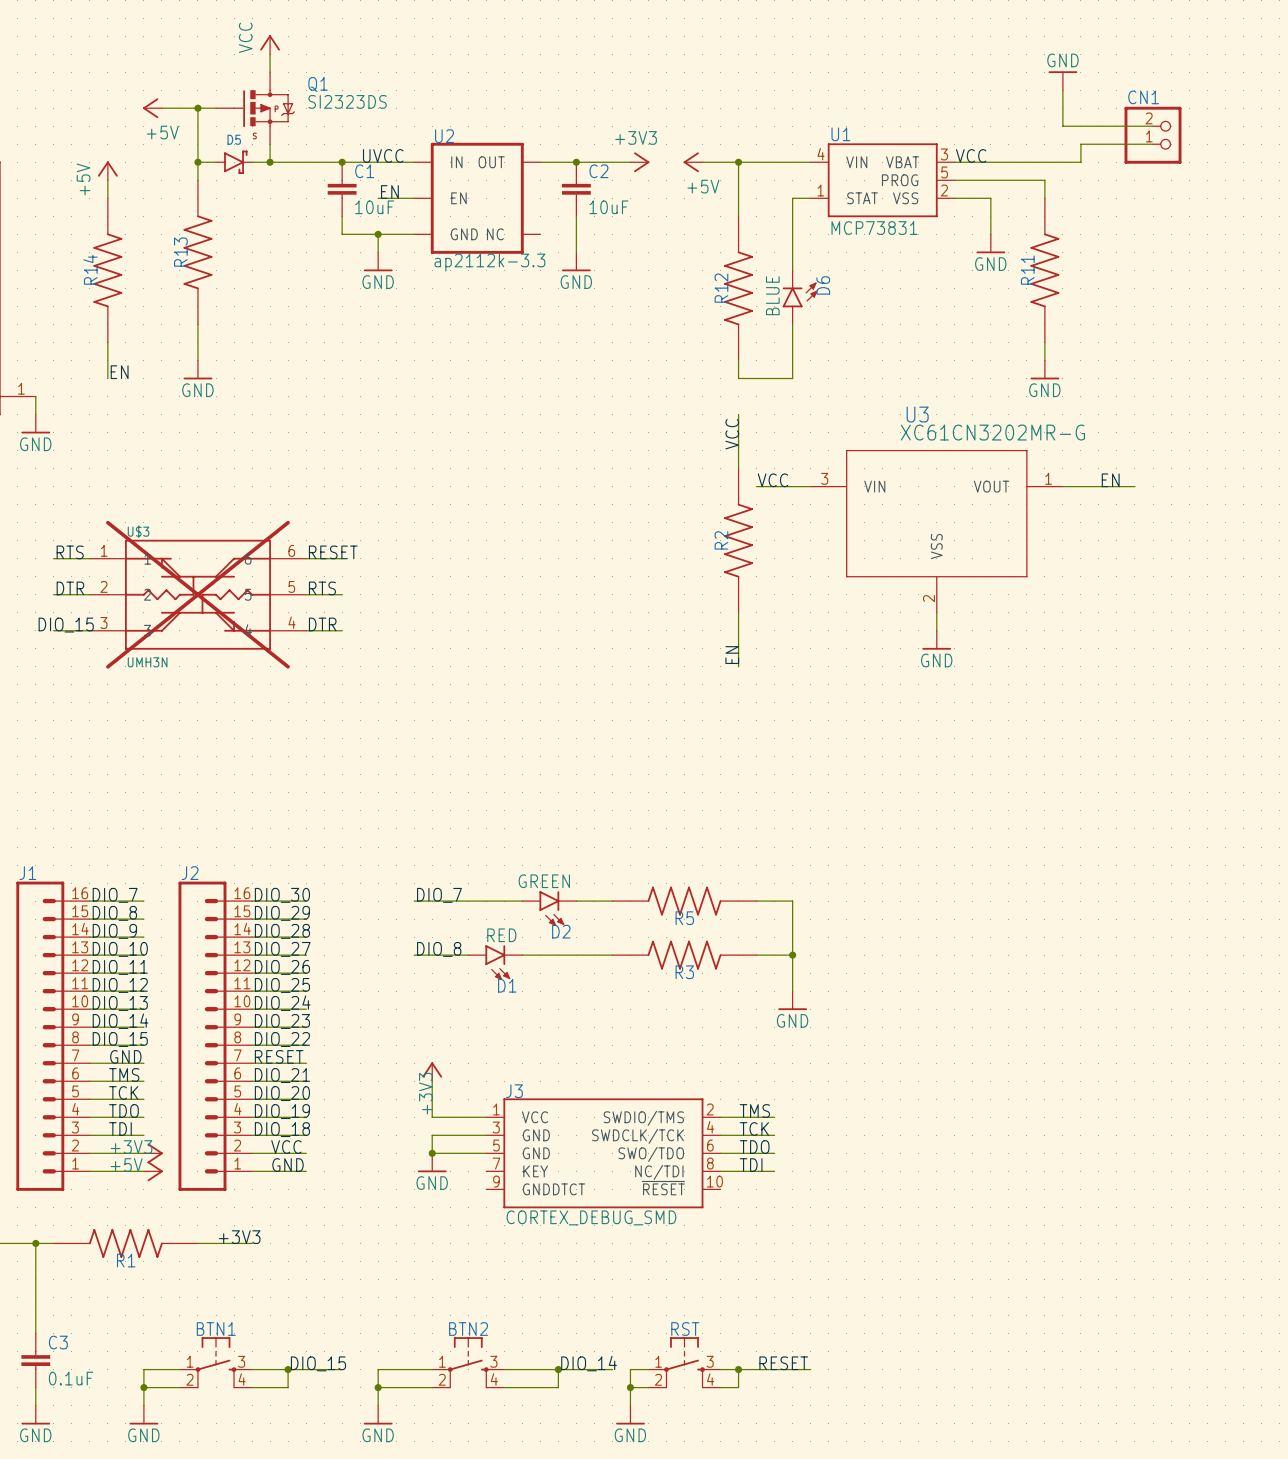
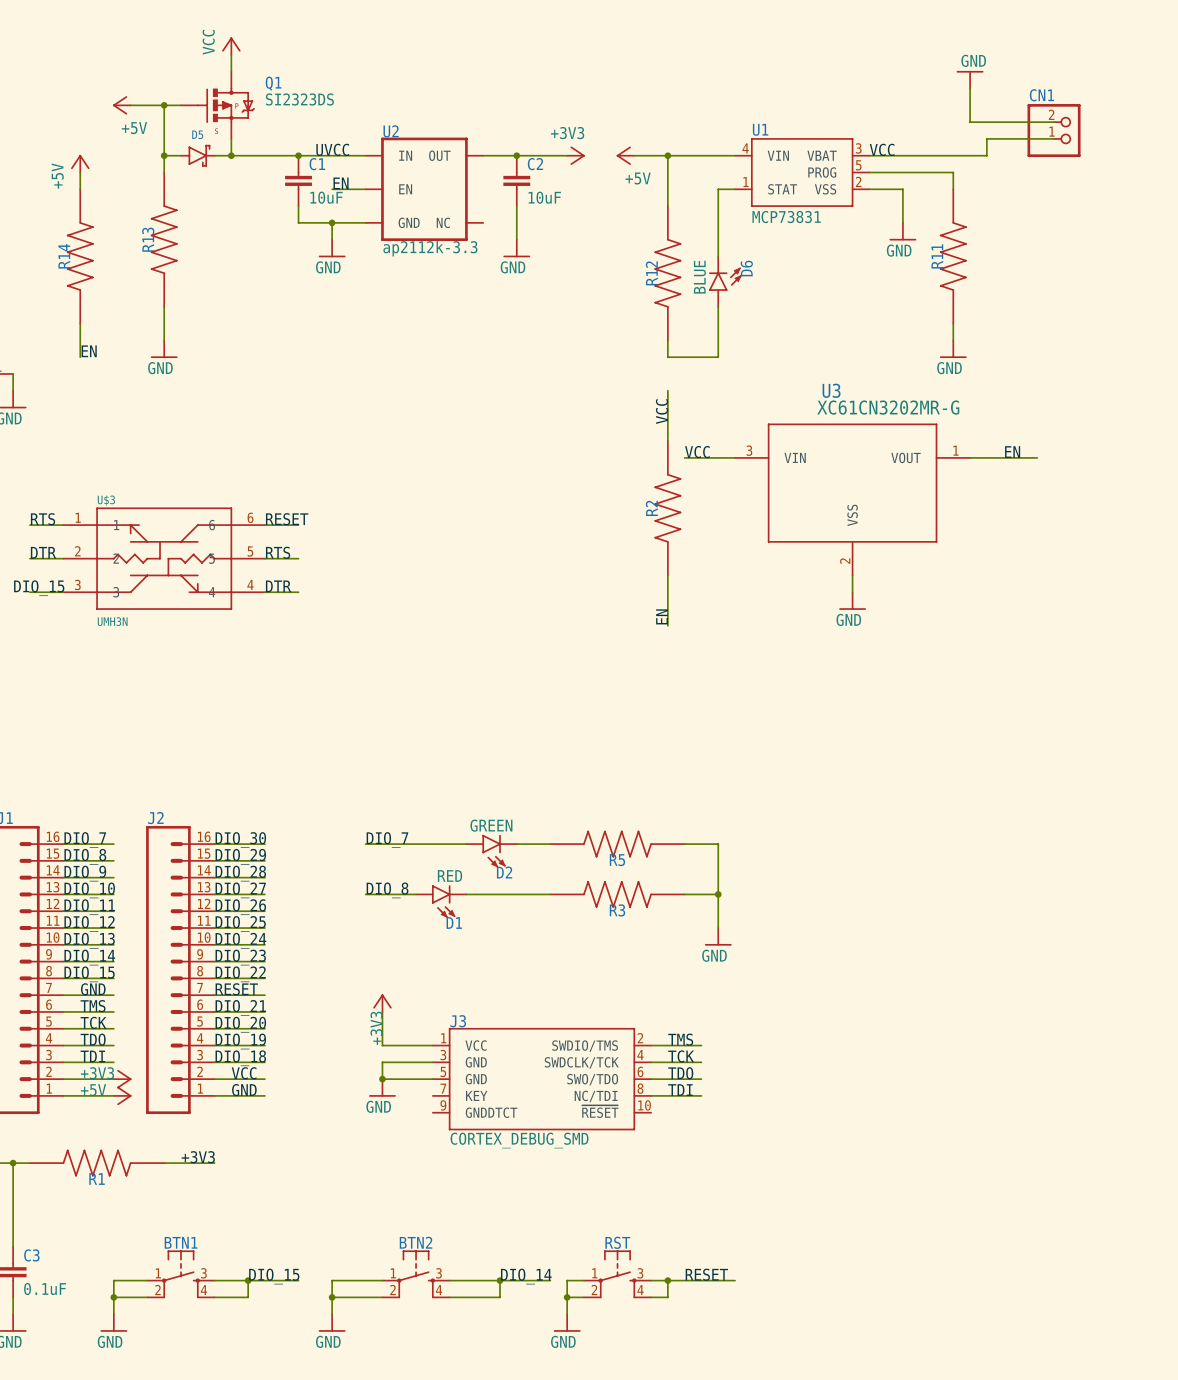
line: (107, 522) (288, 666) -> none
line: (288, 522) (107, 666) -> none

